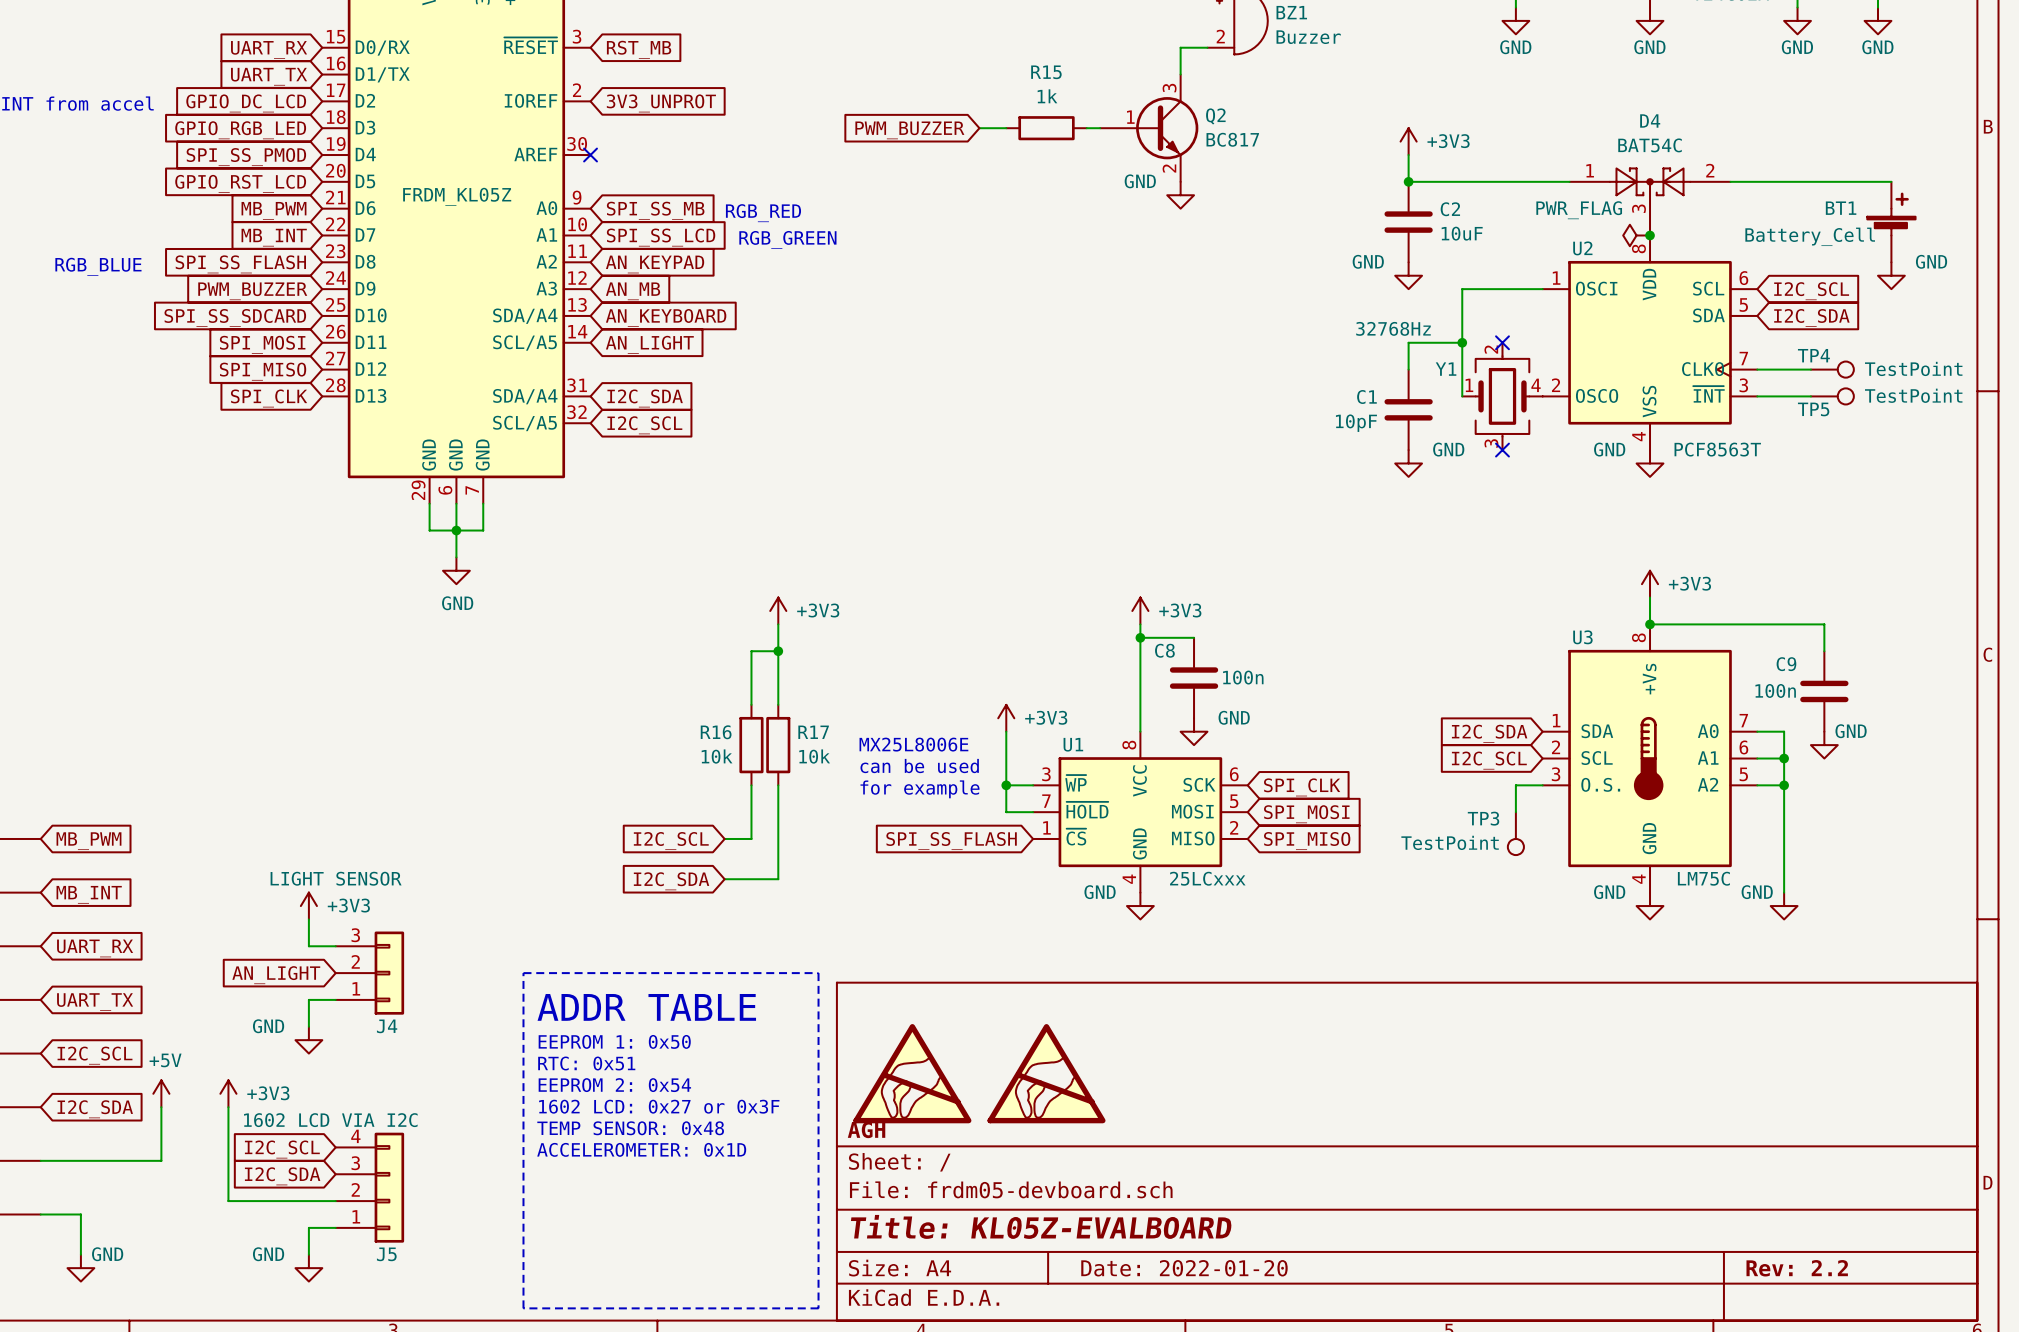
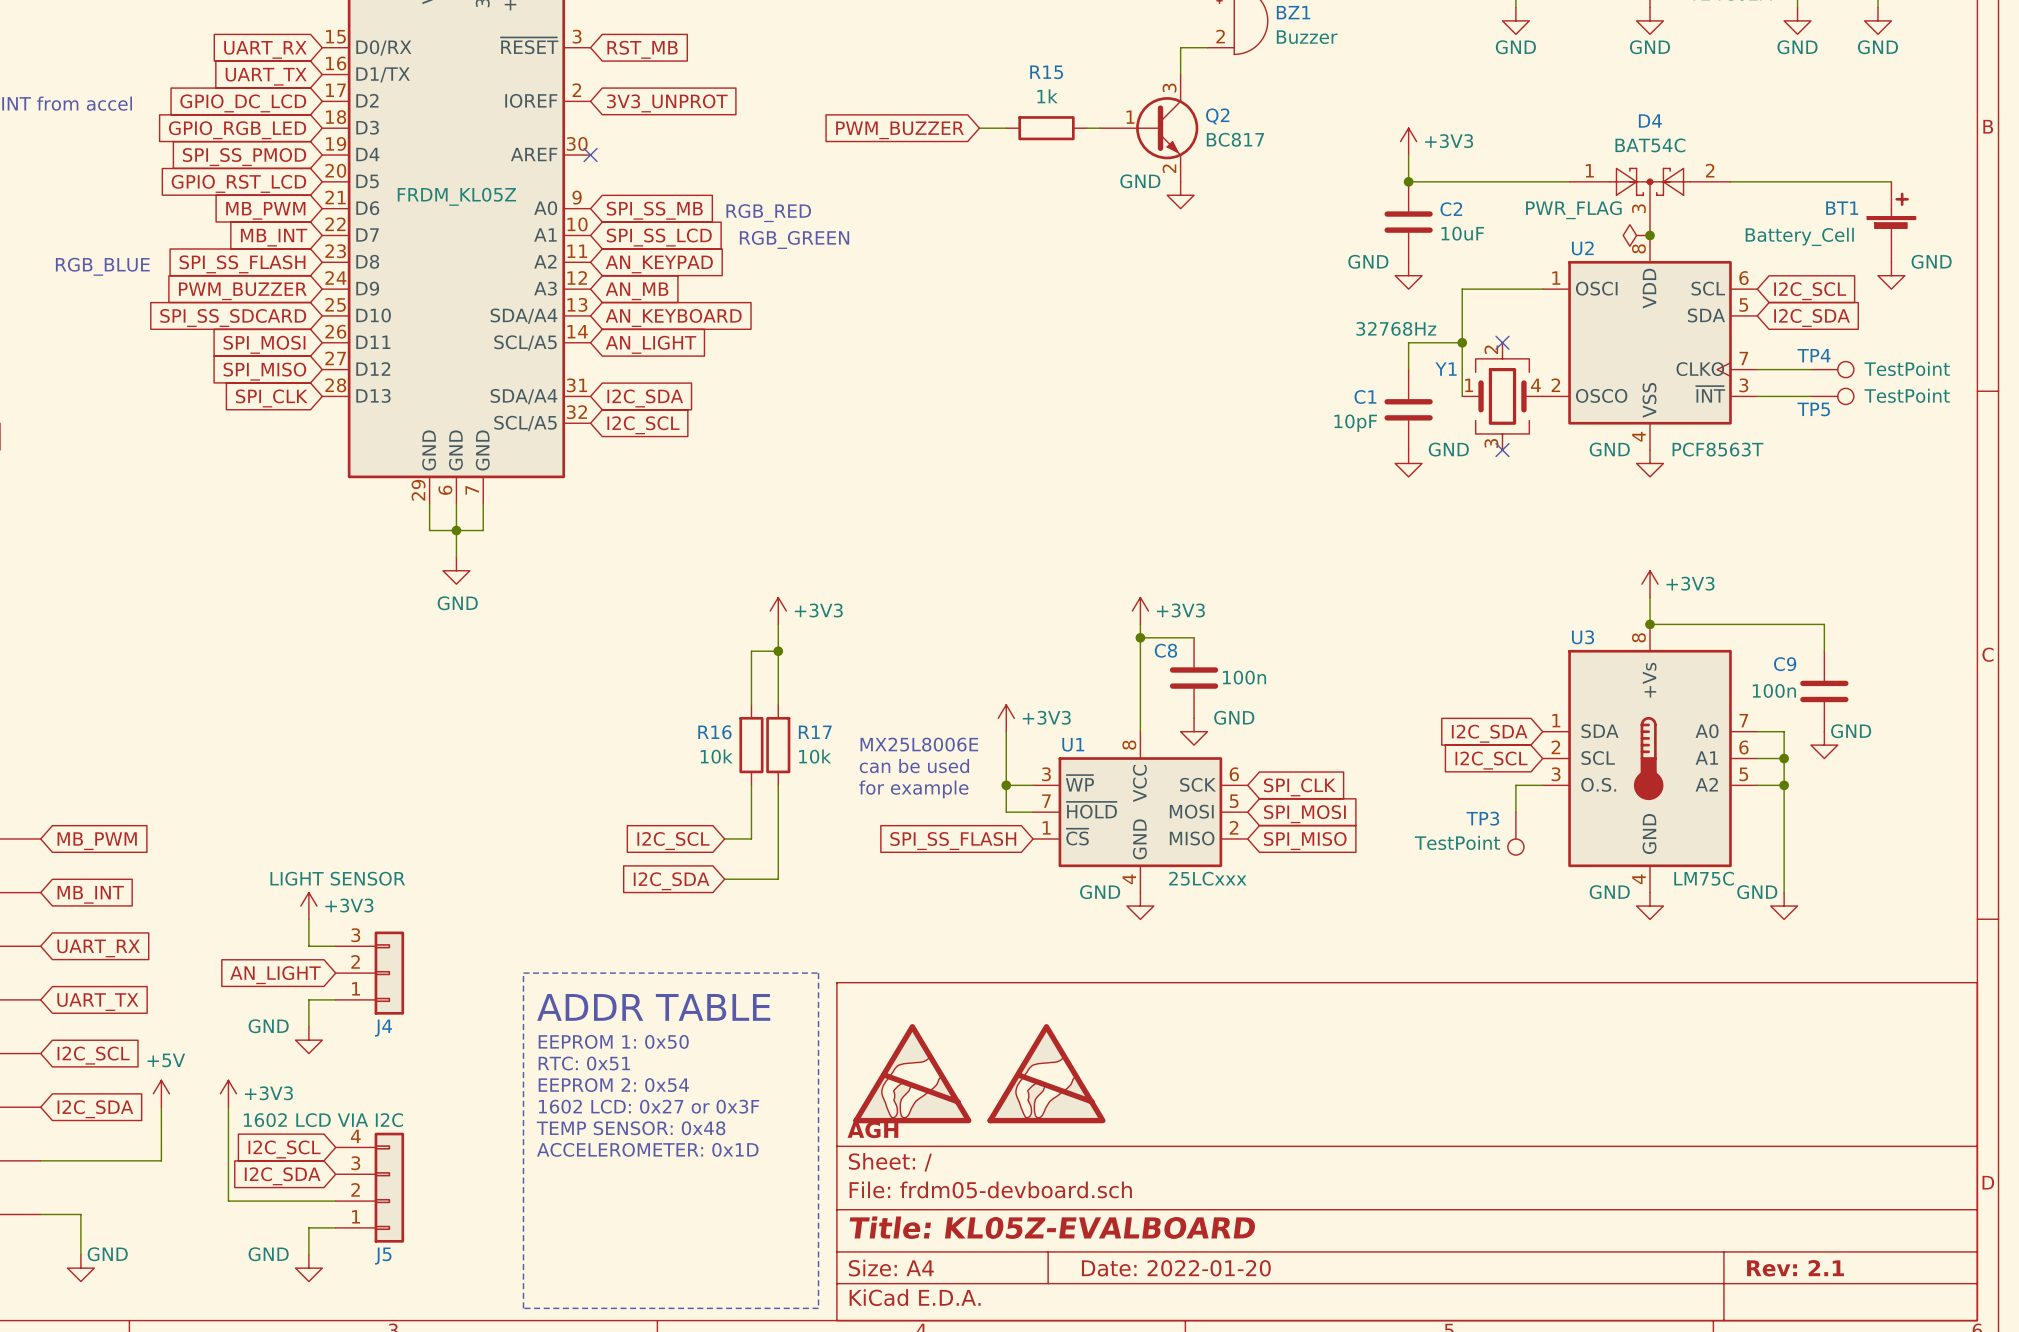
title block: Rev: 2.2 (1797, 1268) -> Rev: 2.1 (1795, 1268)

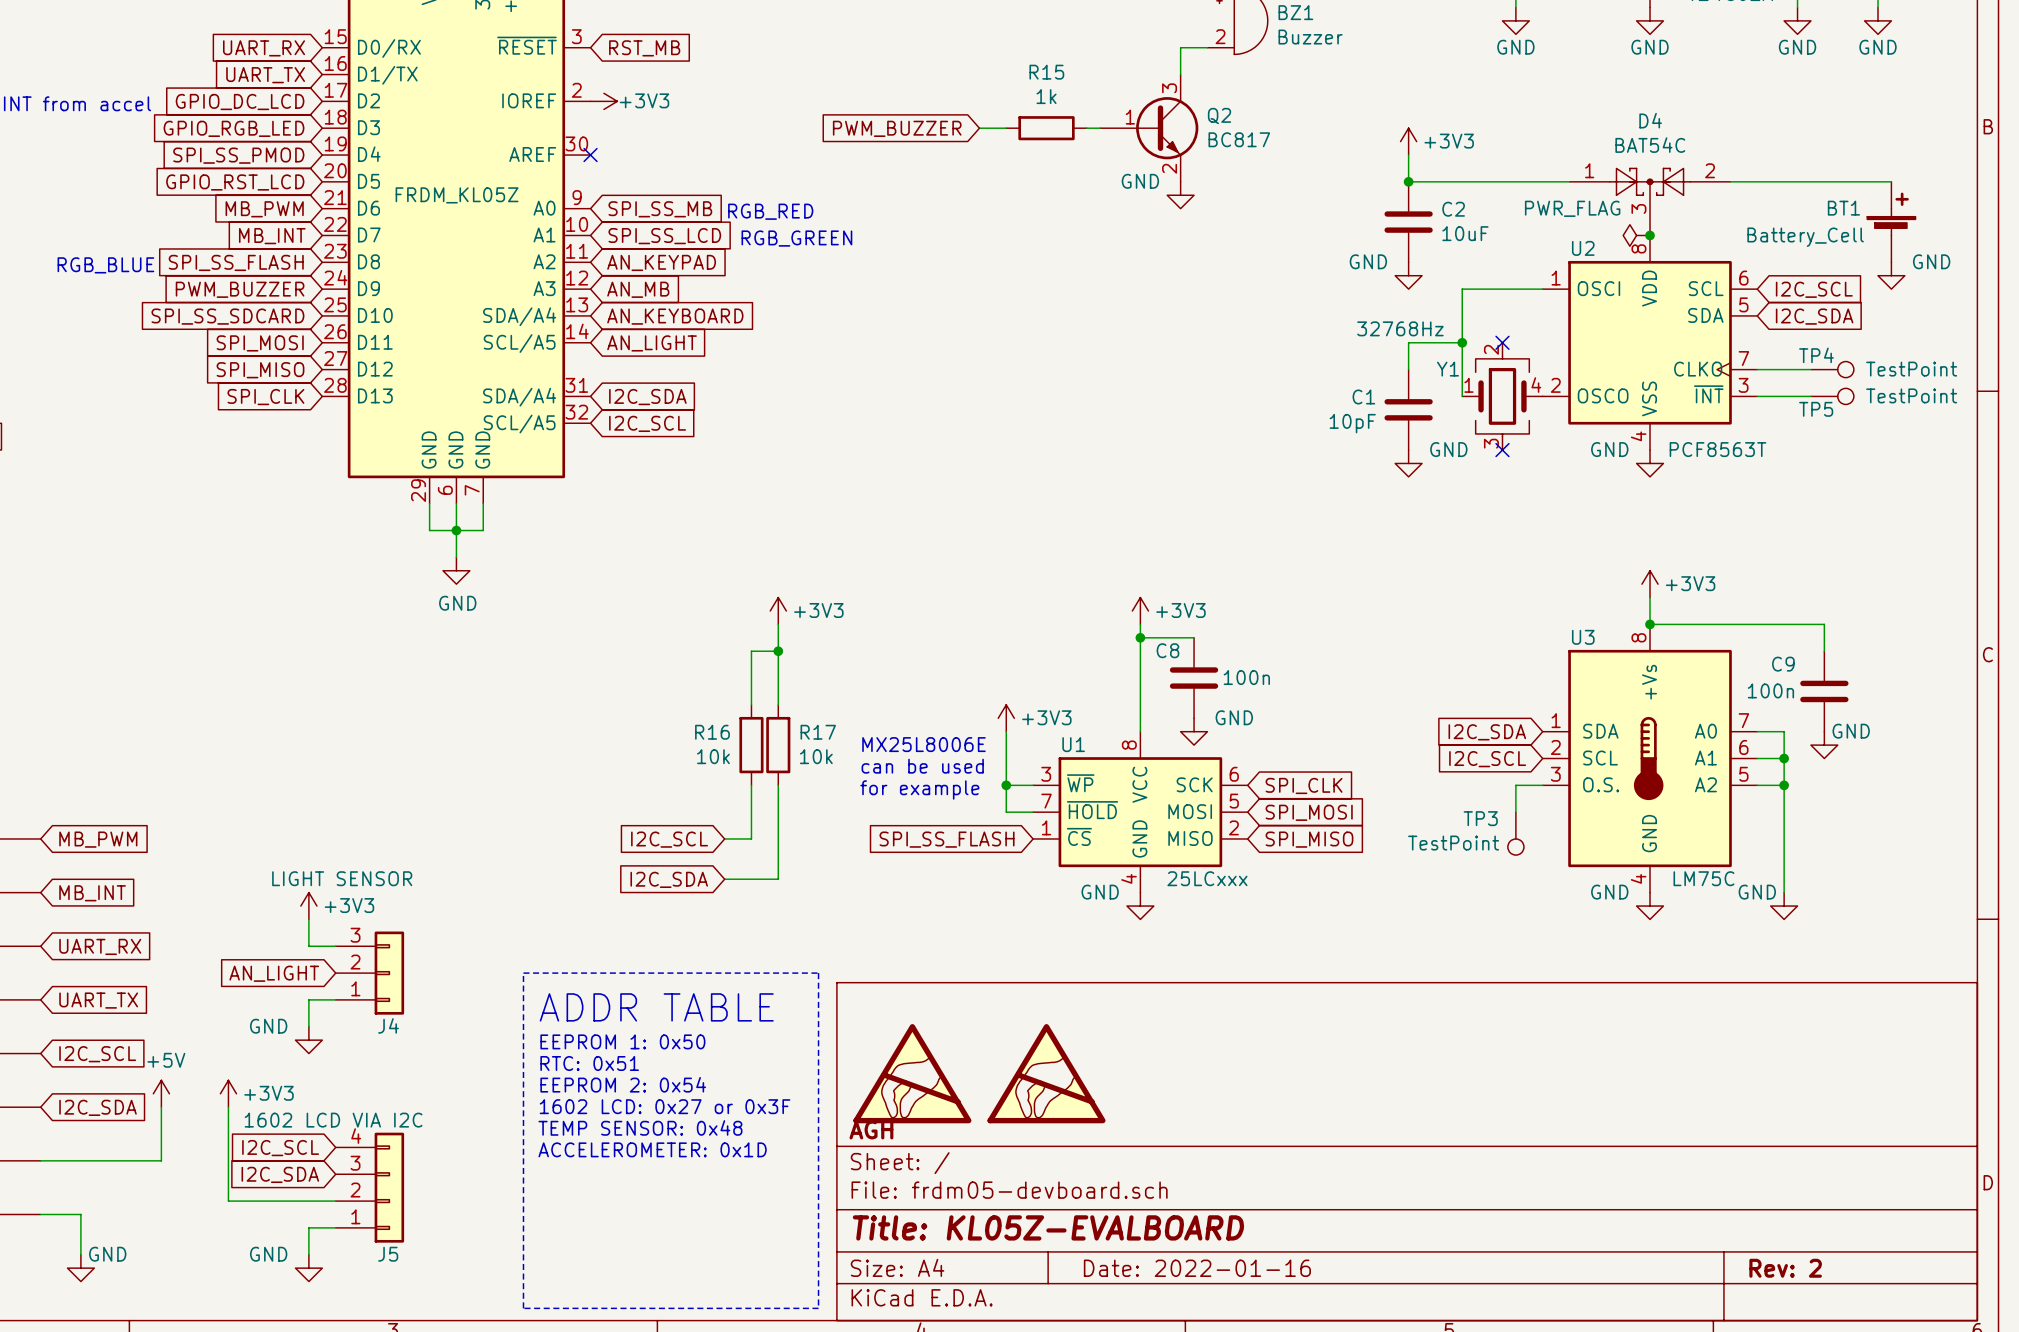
power symbol: none -> +3V3 (603, 101)
global label: 3V3_UNPROT (667, 103) -> none
title block: Date: 2022-01-20 (1176, 1268) -> Date: 2022-01-16 (1197, 1268)
title block: Rev: 2.1 (1795, 1268) -> Rev: 2 (1785, 1268)

